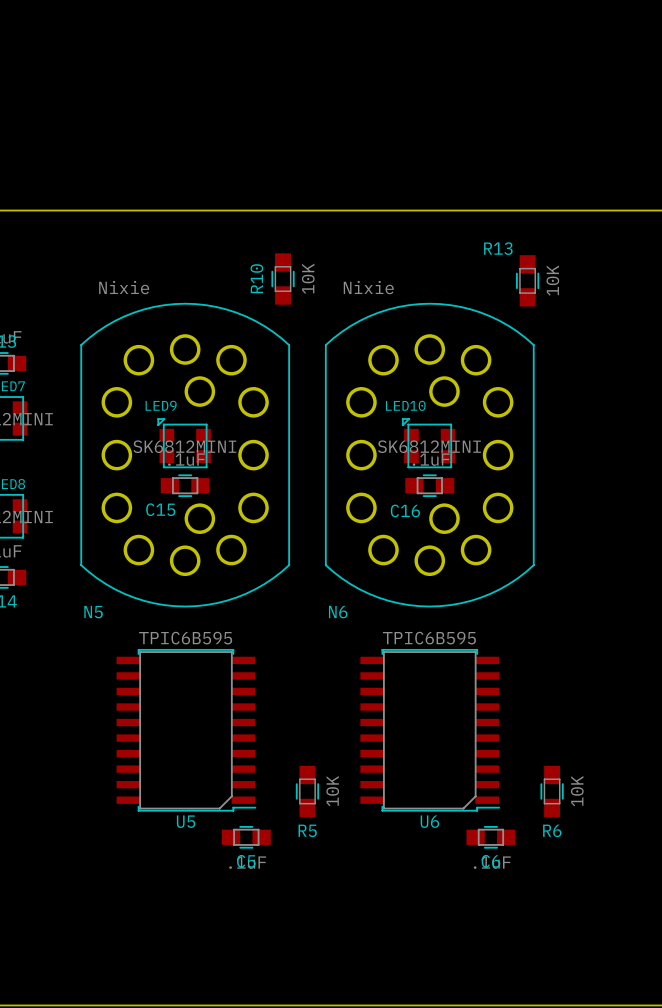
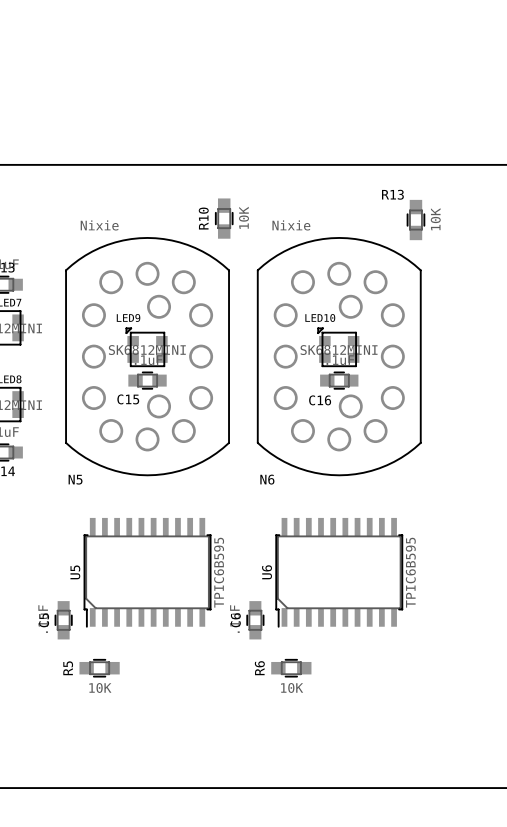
U5 rotation: 0° (186, 730) -> 90° clockwise (147, 572)
U6 rotation: 0° (430, 730) -> 90° clockwise (339, 572)
R5 rotation: 0° (307, 791) -> 90° clockwise (99, 668)
R5 position: (307, 791) -> (99, 668)
R6 rotation: 0° (552, 791) -> 90° clockwise (291, 668)
R6 position: (552, 791) -> (291, 668)
C5 rotation: 0° (246, 837) -> 90° clockwise (63, 620)
C5 position: (246, 837) -> (63, 620)
C6 rotation: 0° (490, 837) -> 90° clockwise (255, 620)
C6 position: (490, 837) -> (255, 620)

